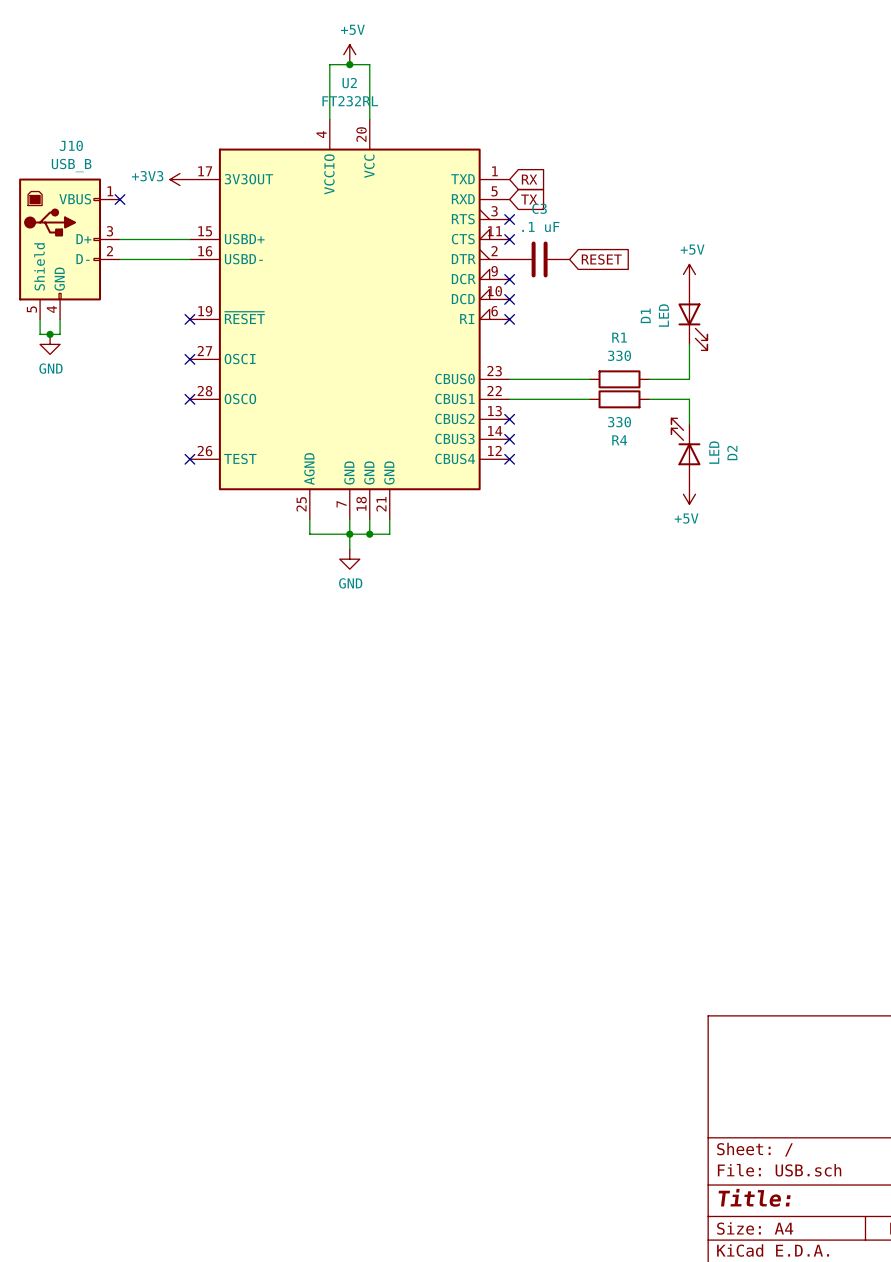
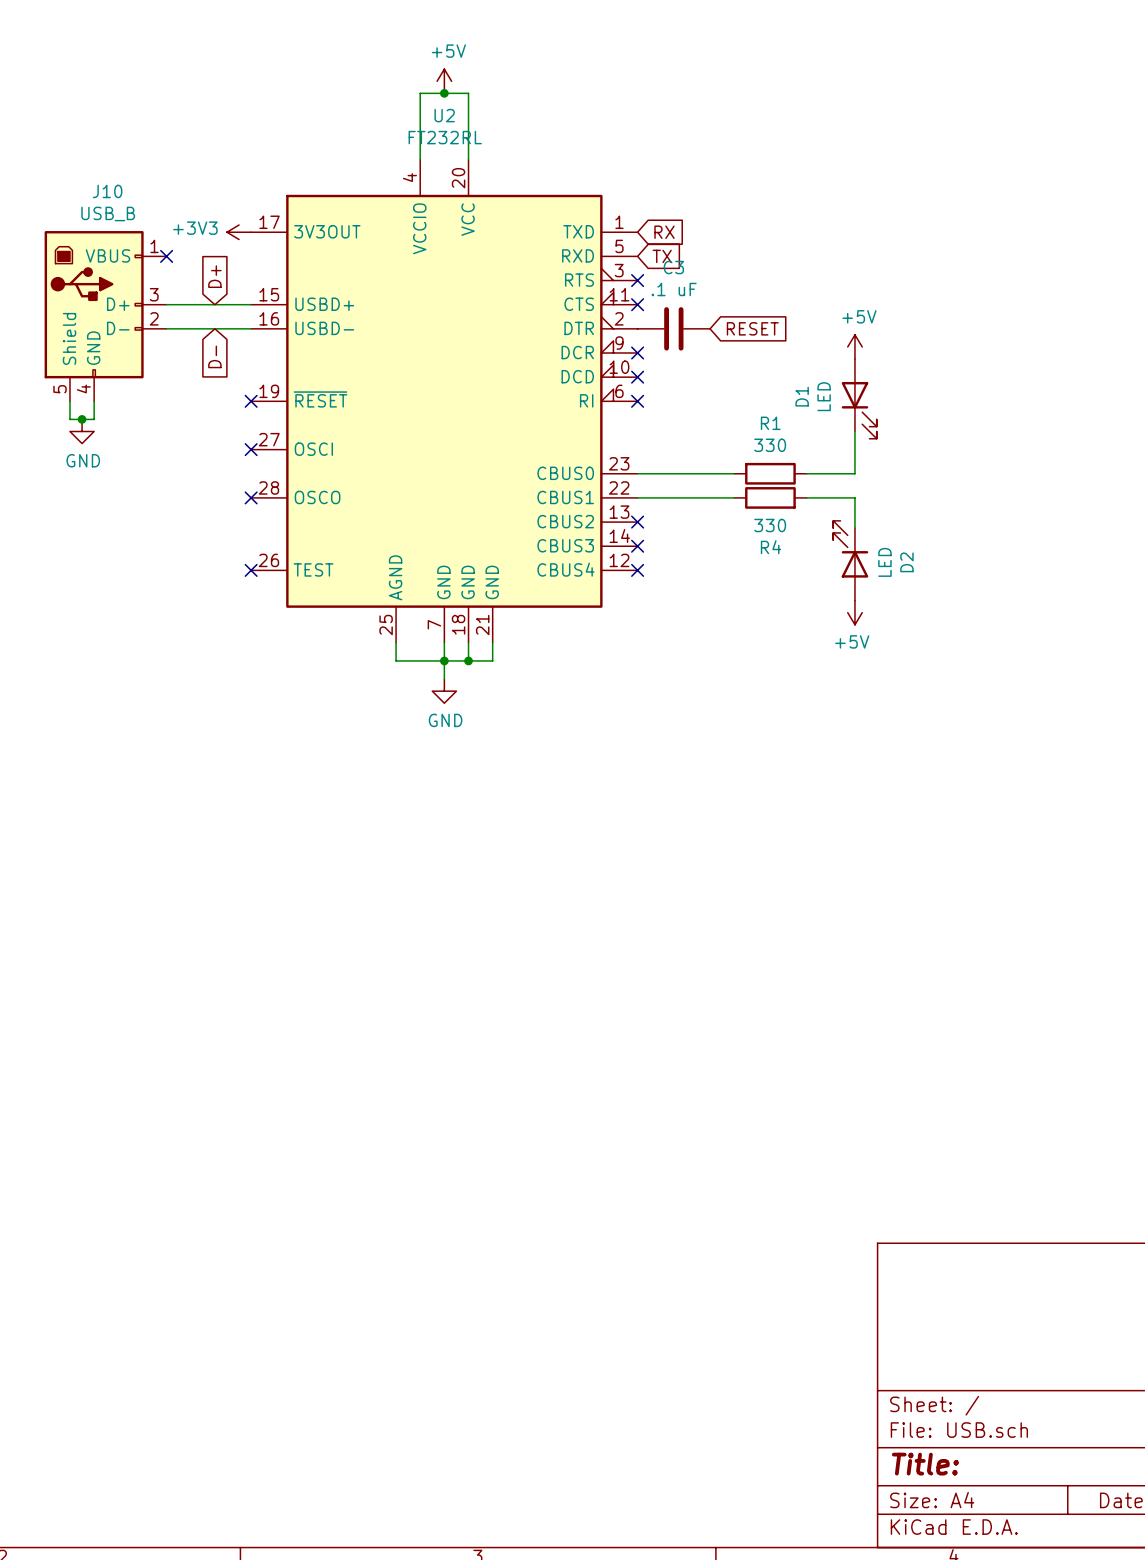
global label: none -> D+ (214, 276)
global label: none -> D- (214, 356)

